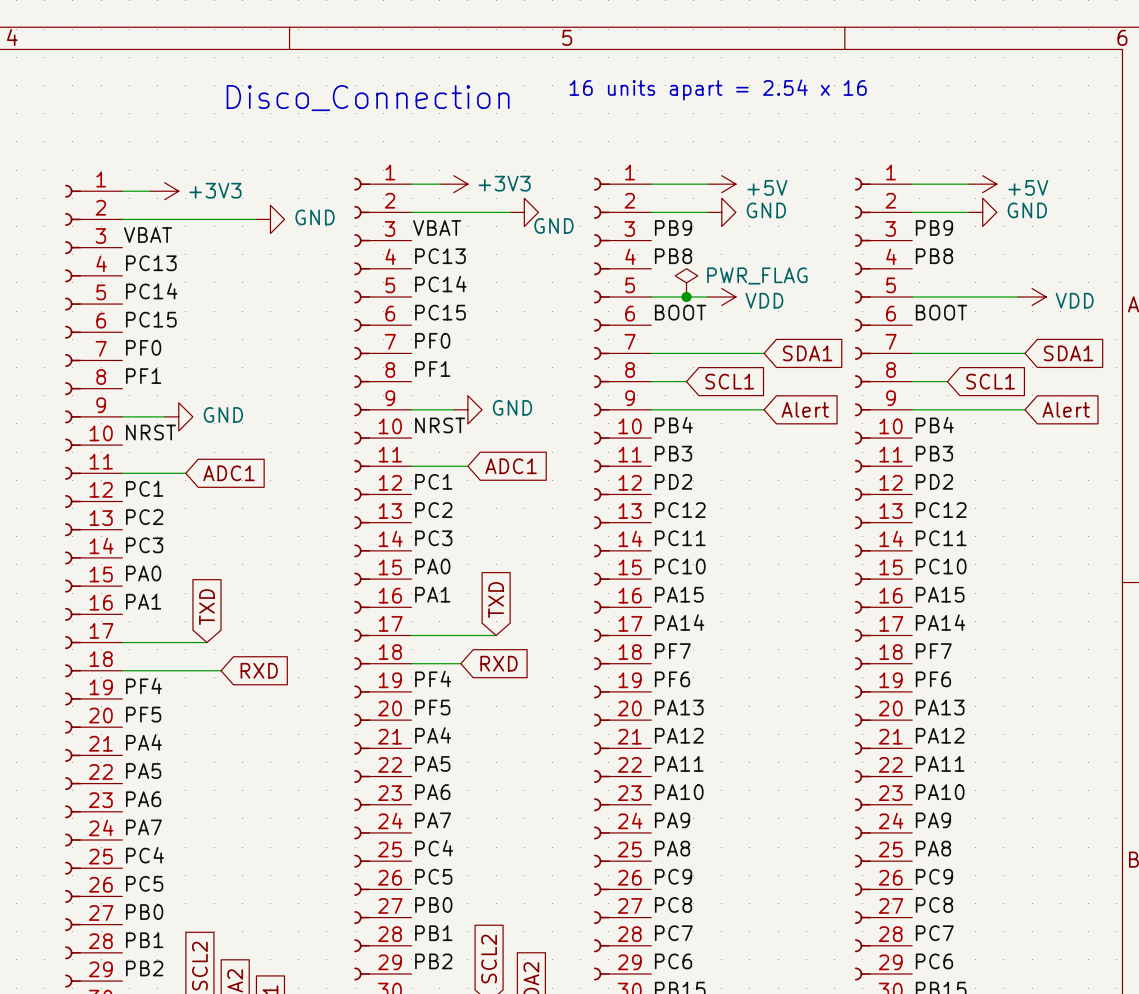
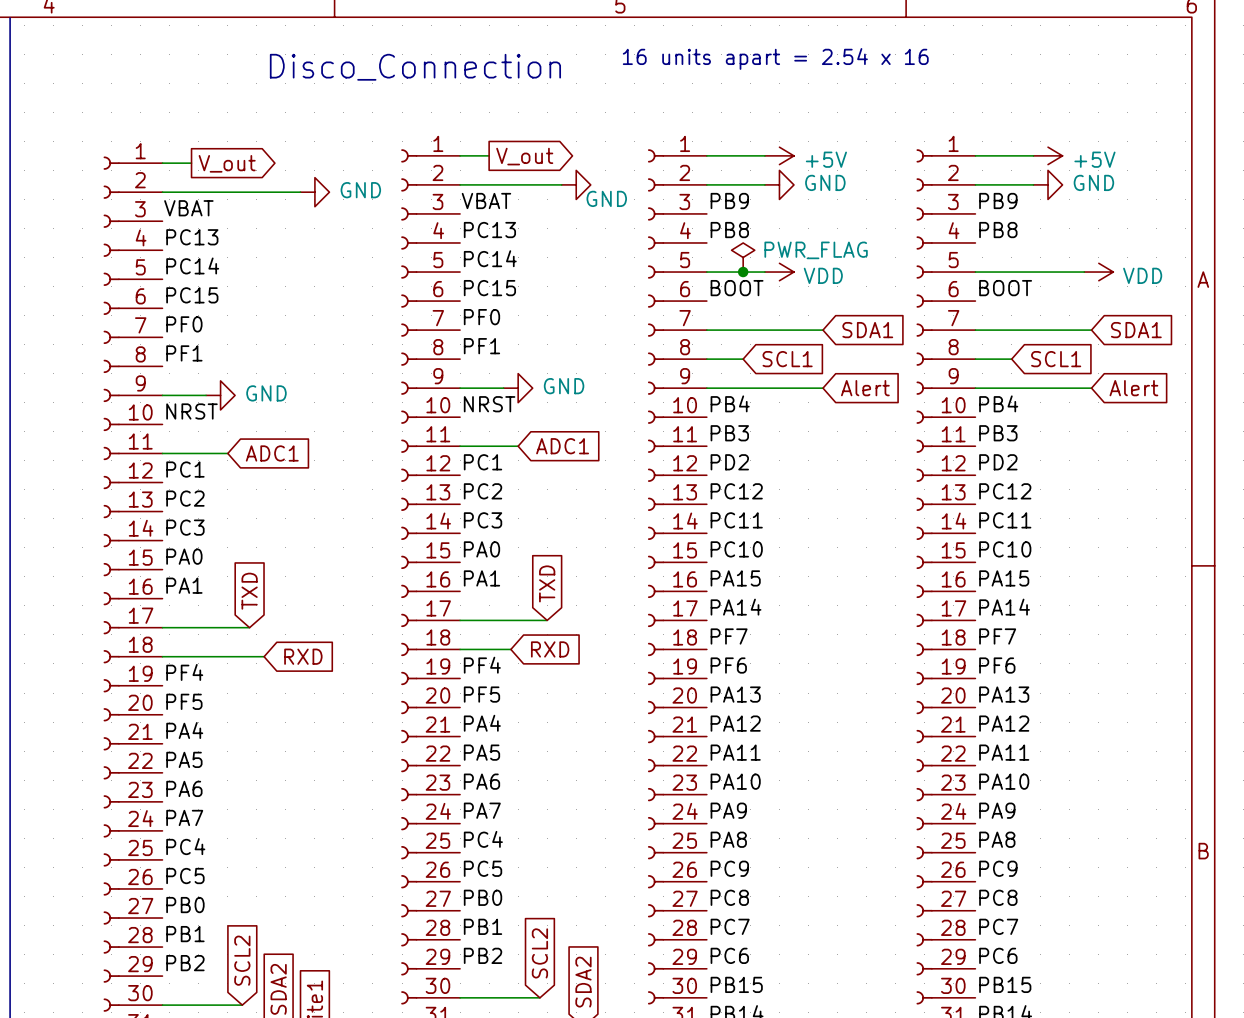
power symbol: +3V3 (453, 184) -> none
global label: none -> V_out (524, 156)
power symbol: +3V3 (164, 191) -> none
global label: none -> V_out (227, 163)

